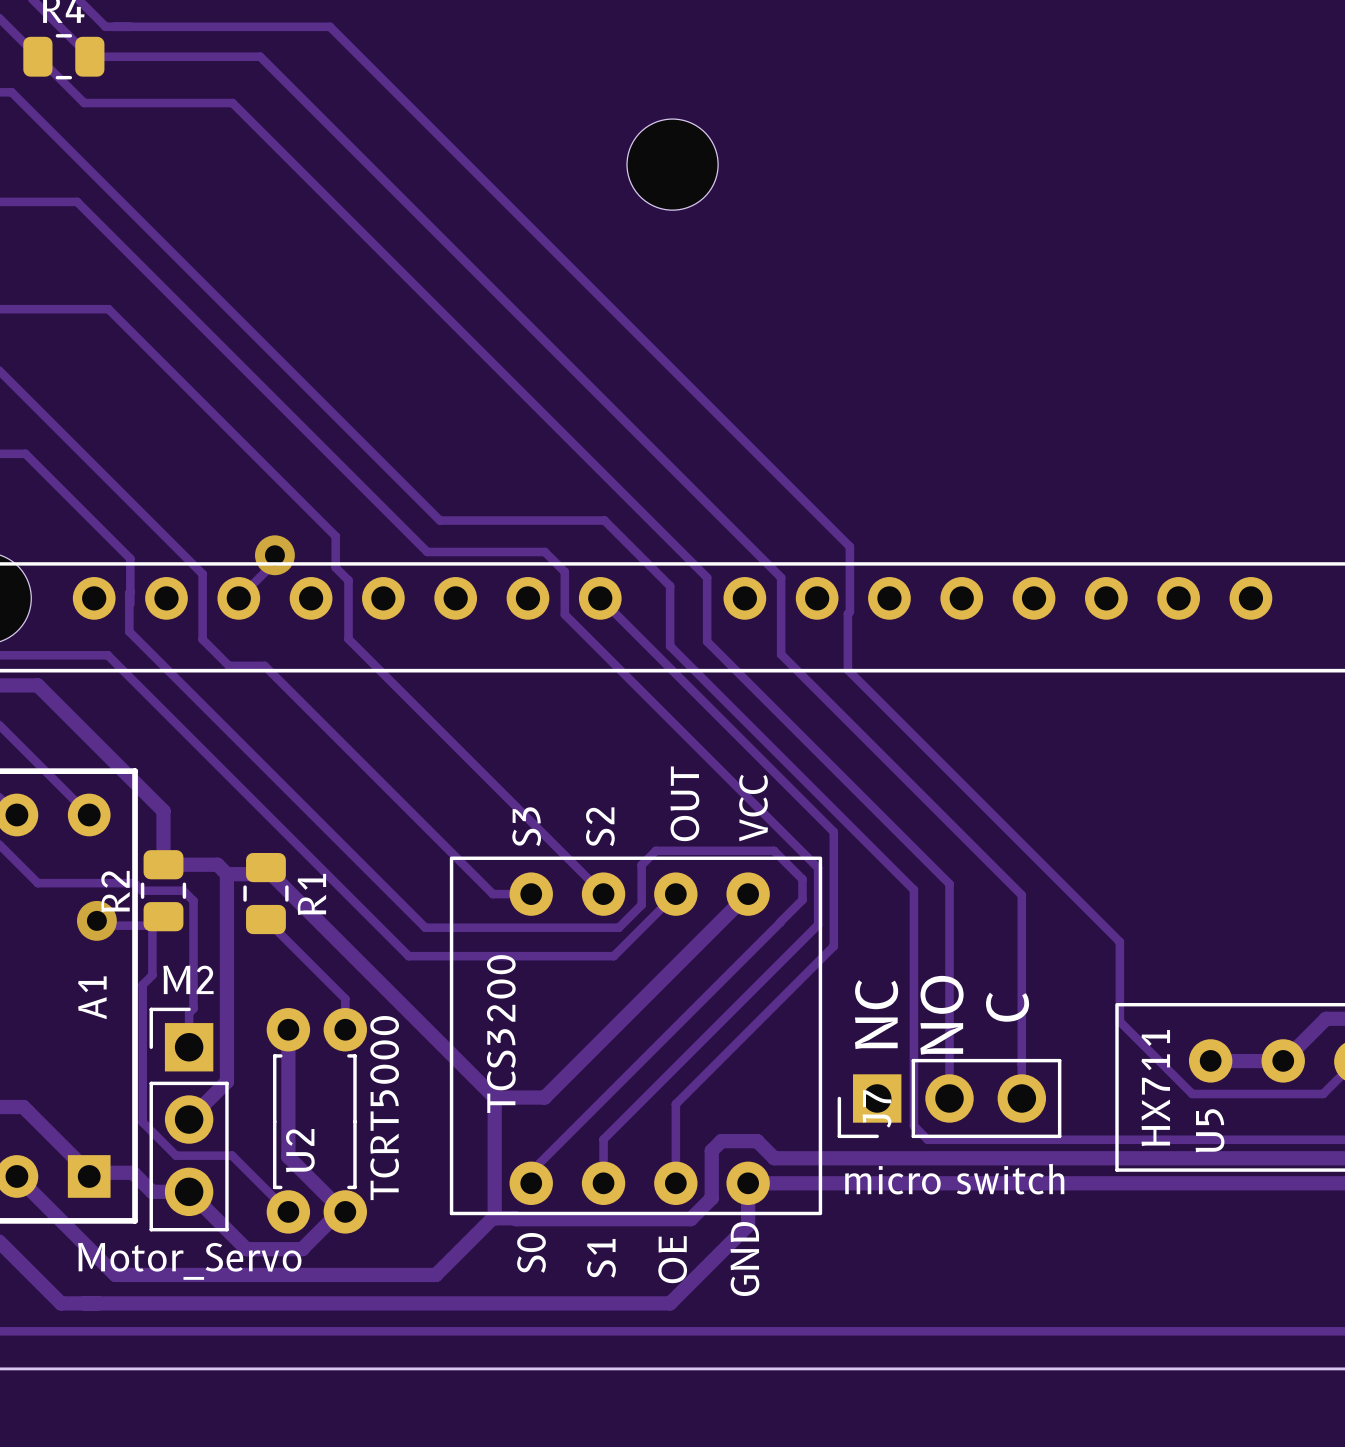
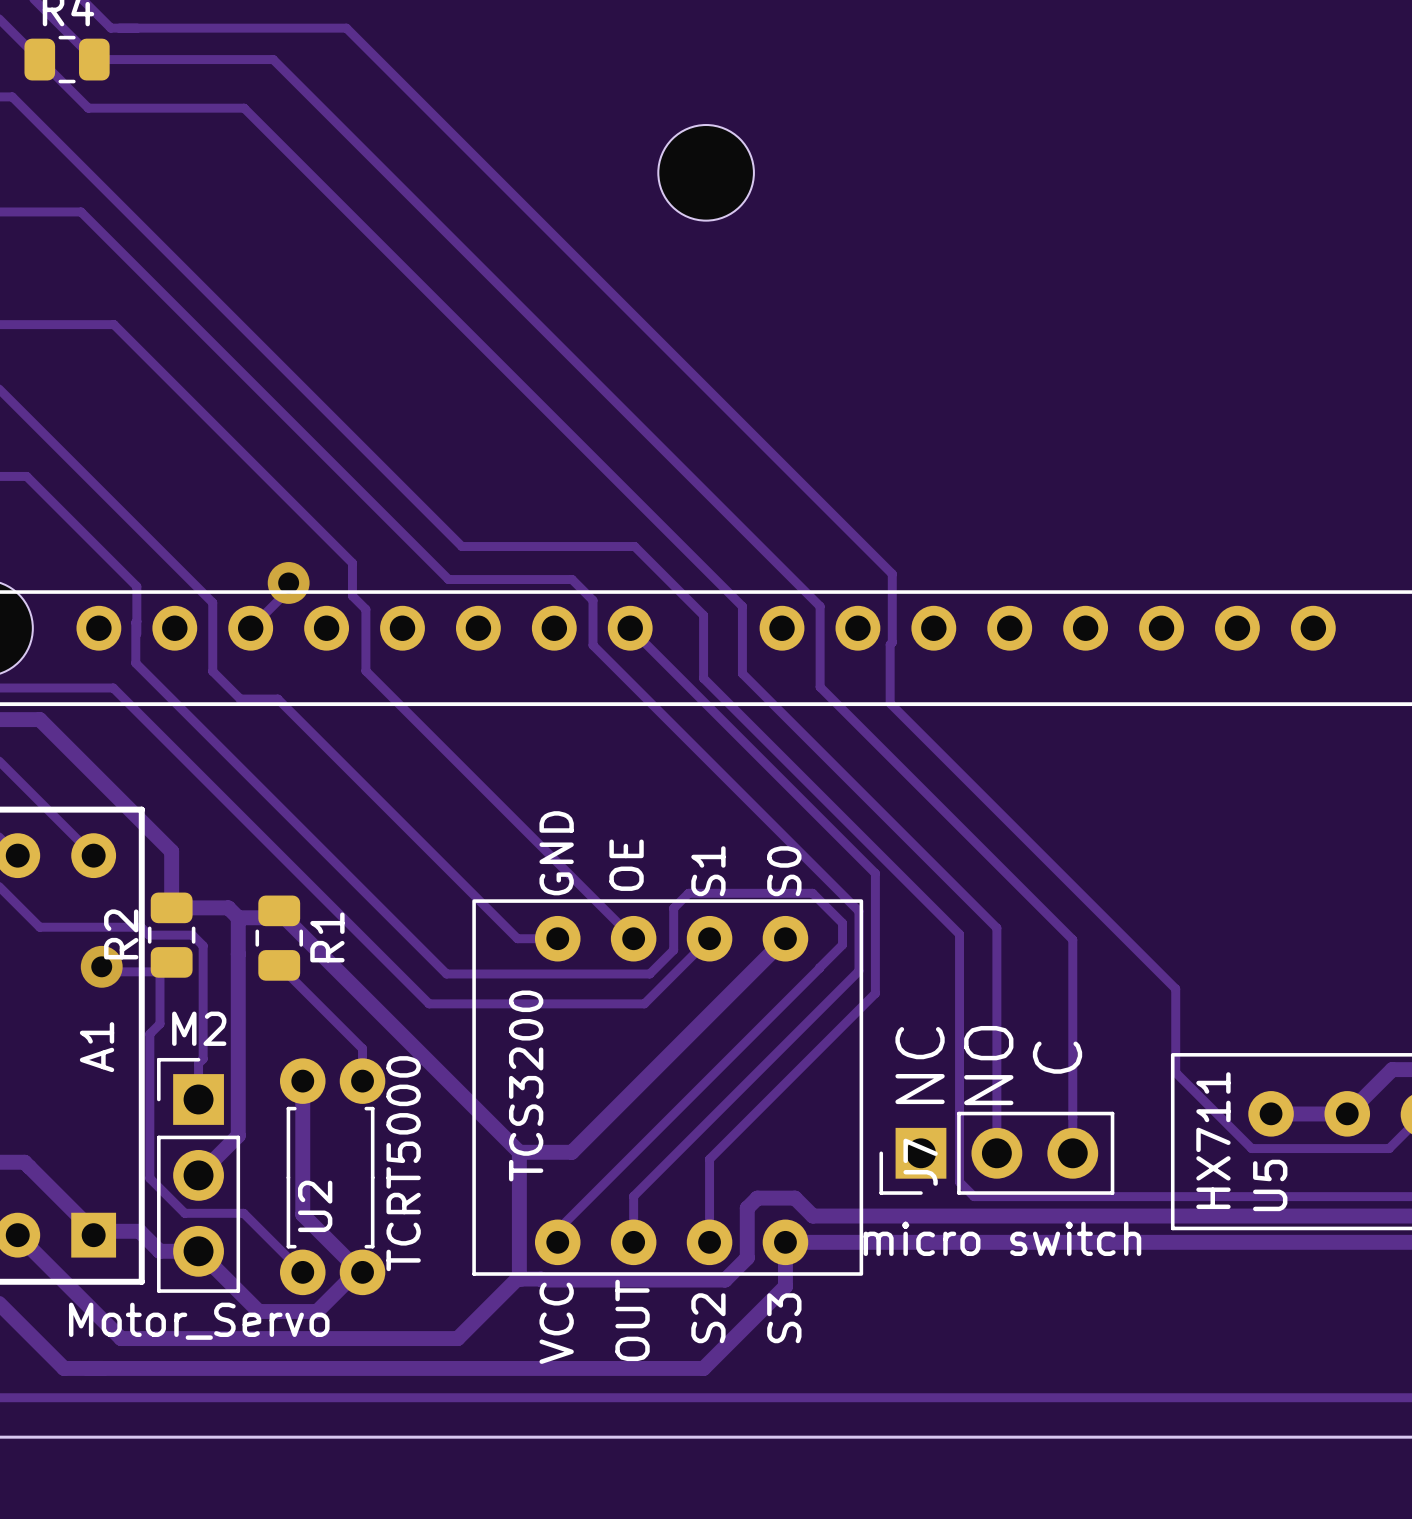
part text position: OUT (684, 803) -> OUT (632, 1320)
part text position: VCC (753, 807) -> VCC (556, 1323)
part text position: S3 (526, 826) -> S3 (784, 1318)
part text position: S2 (600, 826) -> S2 (708, 1318)
part text position: S0 (531, 1252) -> S0 (784, 871)
part text position: S1 (601, 1258) -> S1 (708, 871)
part text position: OE (672, 1259) -> OE (626, 865)
part text position: GND (744, 1259) -> GND (556, 853)

